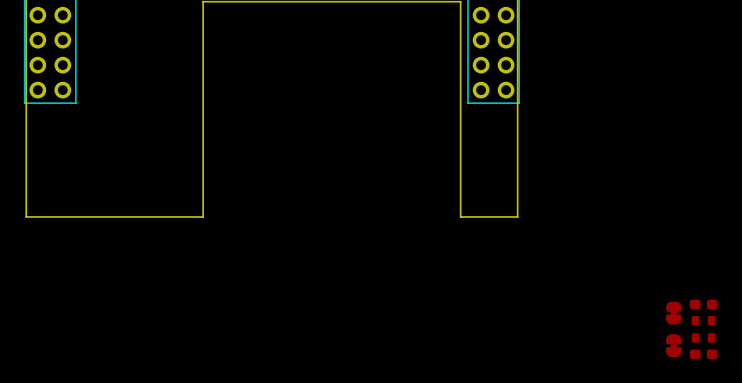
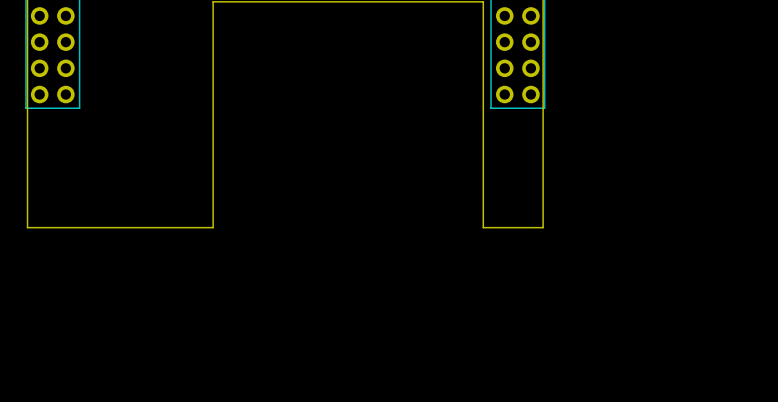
part: (703, 304) -> none
part: (673, 313) -> none
part: (703, 320) -> none
part: (703, 338) -> none
part: (673, 345) -> none
part: (703, 354) -> none

